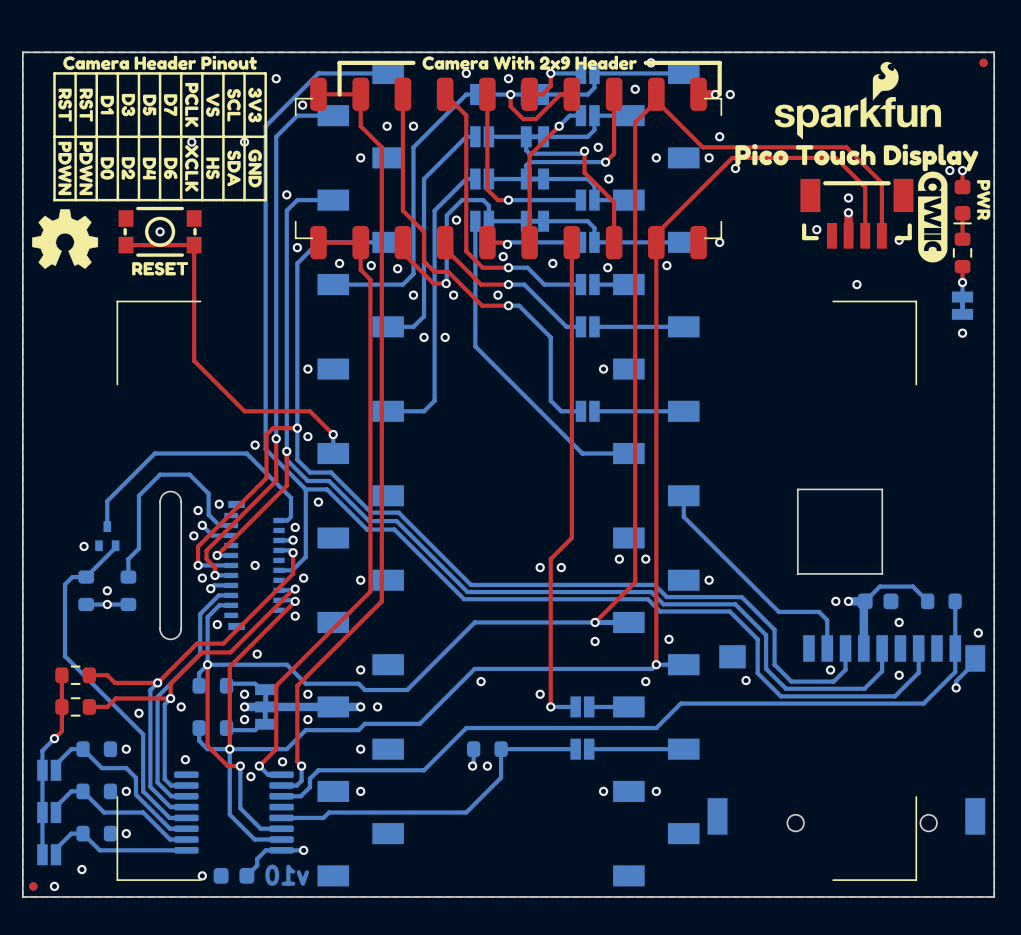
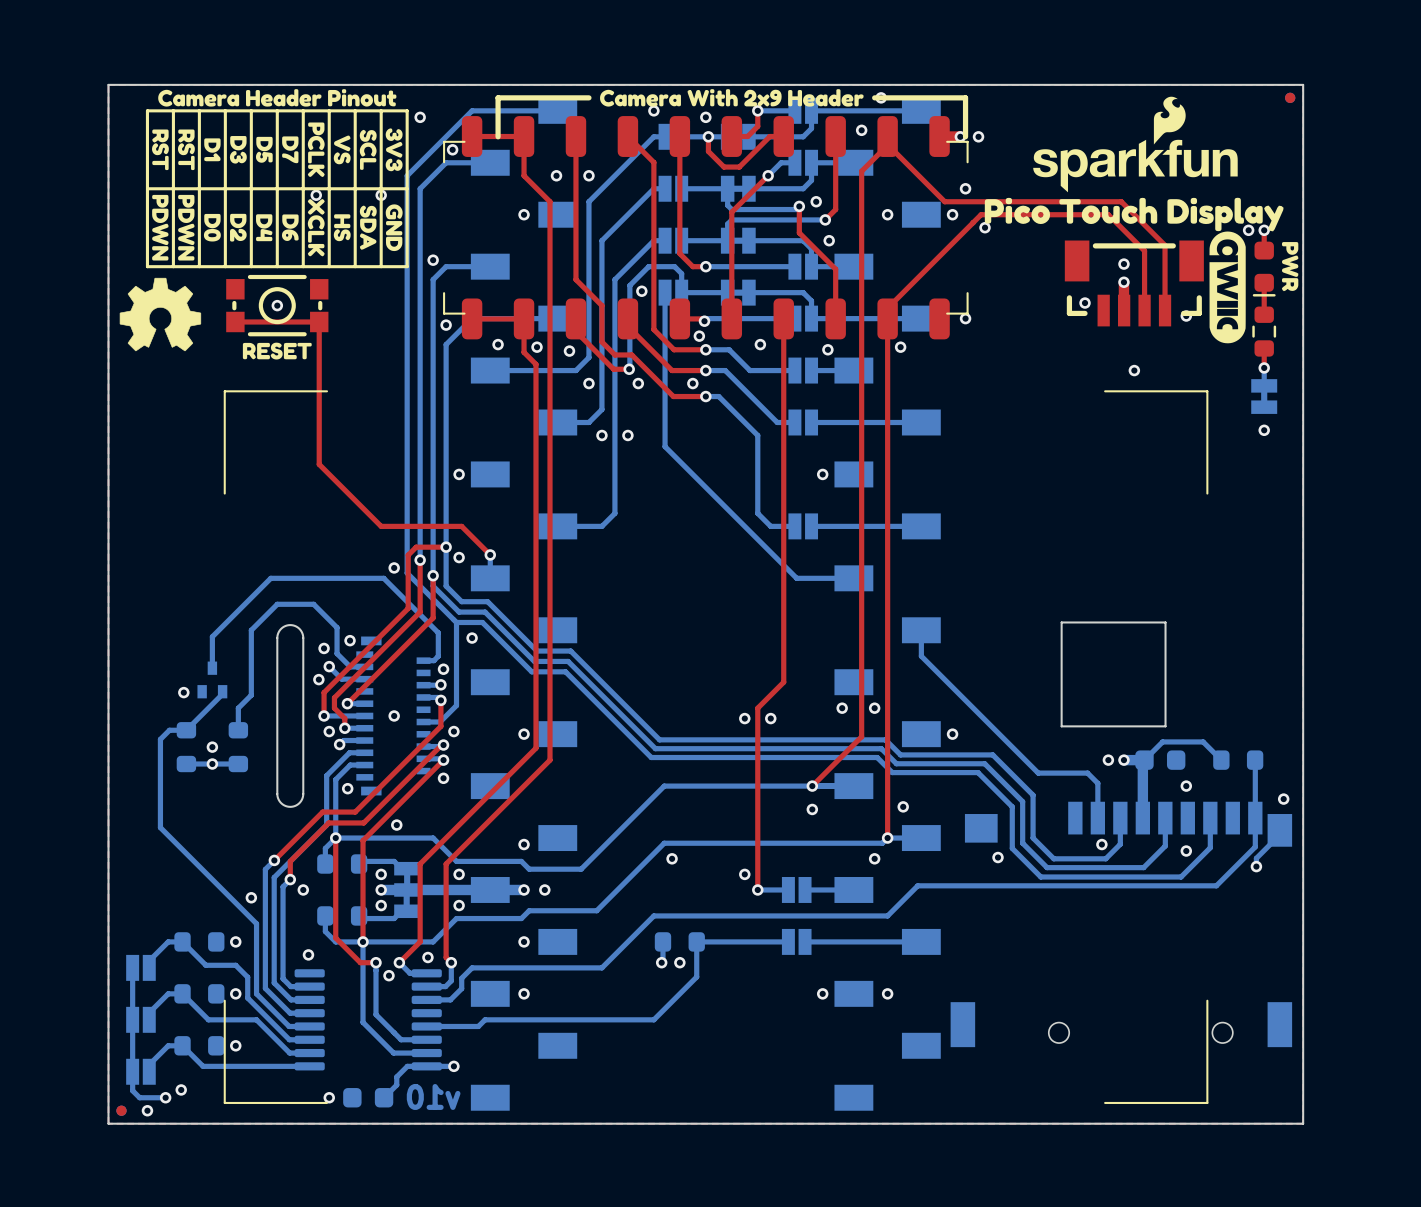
top track: (61, 675) (61, 731) (54, 738) -> none
part: (75, 675) -> none
top track: (89, 675) (107, 675) (114, 682) (157, 682) -> none
top track: (170, 698) (115, 698) (107, 706) (89, 706) -> none
part: (75, 706) -> none
bottom track: (54, 738) (42, 750) (42, 770) -> none
via: (54, 738) -> none
bottom track: none -> (132, 1071) (132, 1090) (139, 1097) (165, 1097)
via: none -> (165, 1097)

